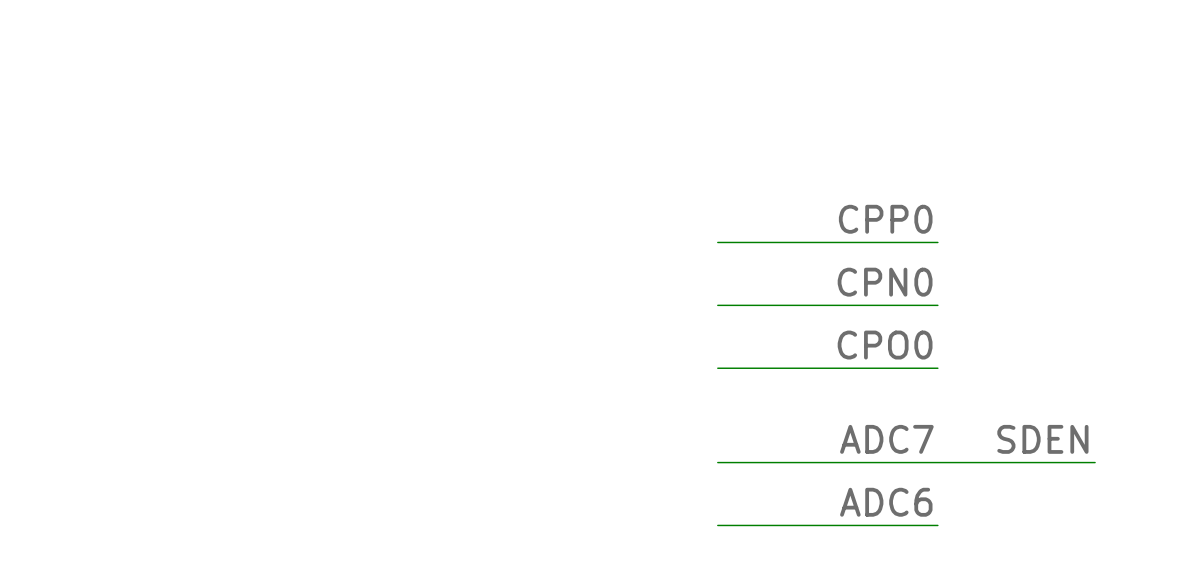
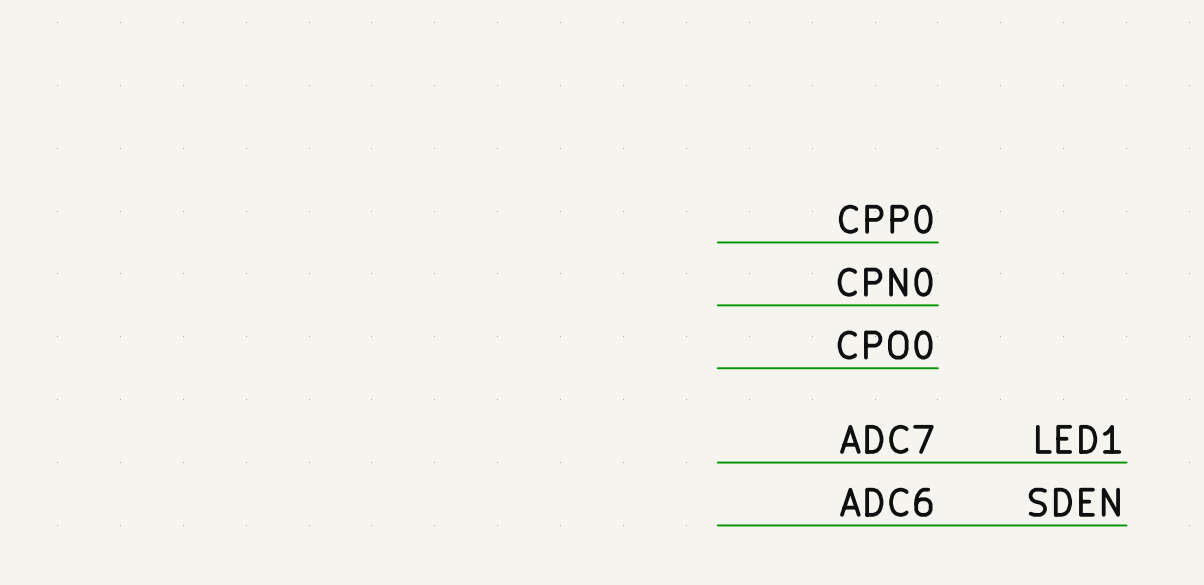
label position: SDEN (1042, 439) -> SDEN (1074, 502)
label: none -> LED1 (1078, 439)
wire: none -> (1095, 462) (1126, 462)
wire: none -> (937, 525) (1126, 525)

